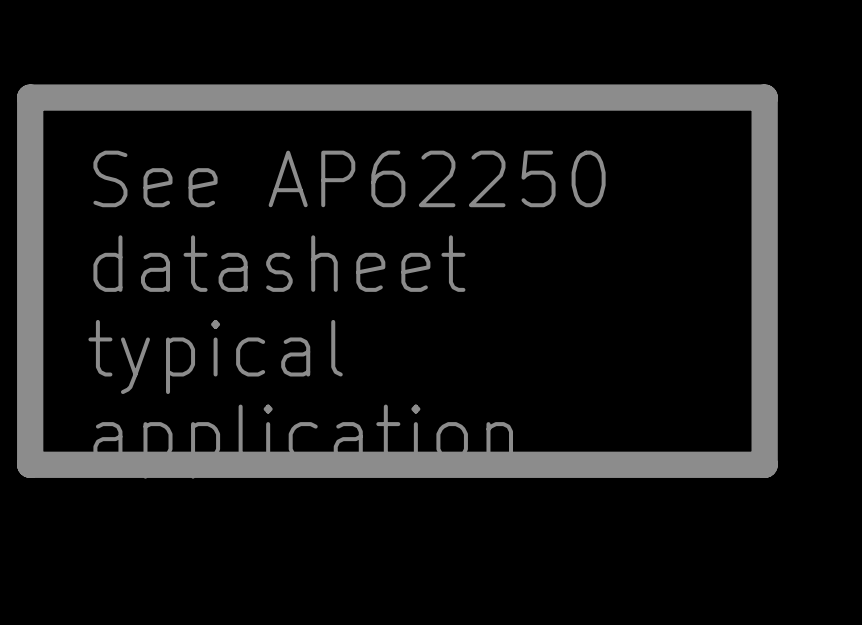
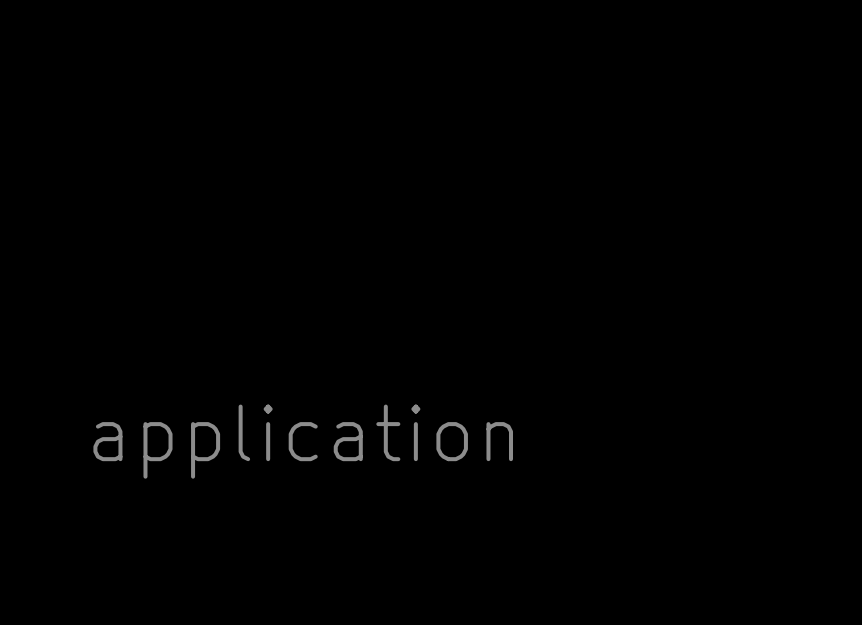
line: (30, 97) (764, 97) (764, 464) (30, 464) (30, 97) -> none
text: See AP62250 (349, 178) -> none
text: datasheet (279, 263) -> none
text: typical (215, 356) -> none

